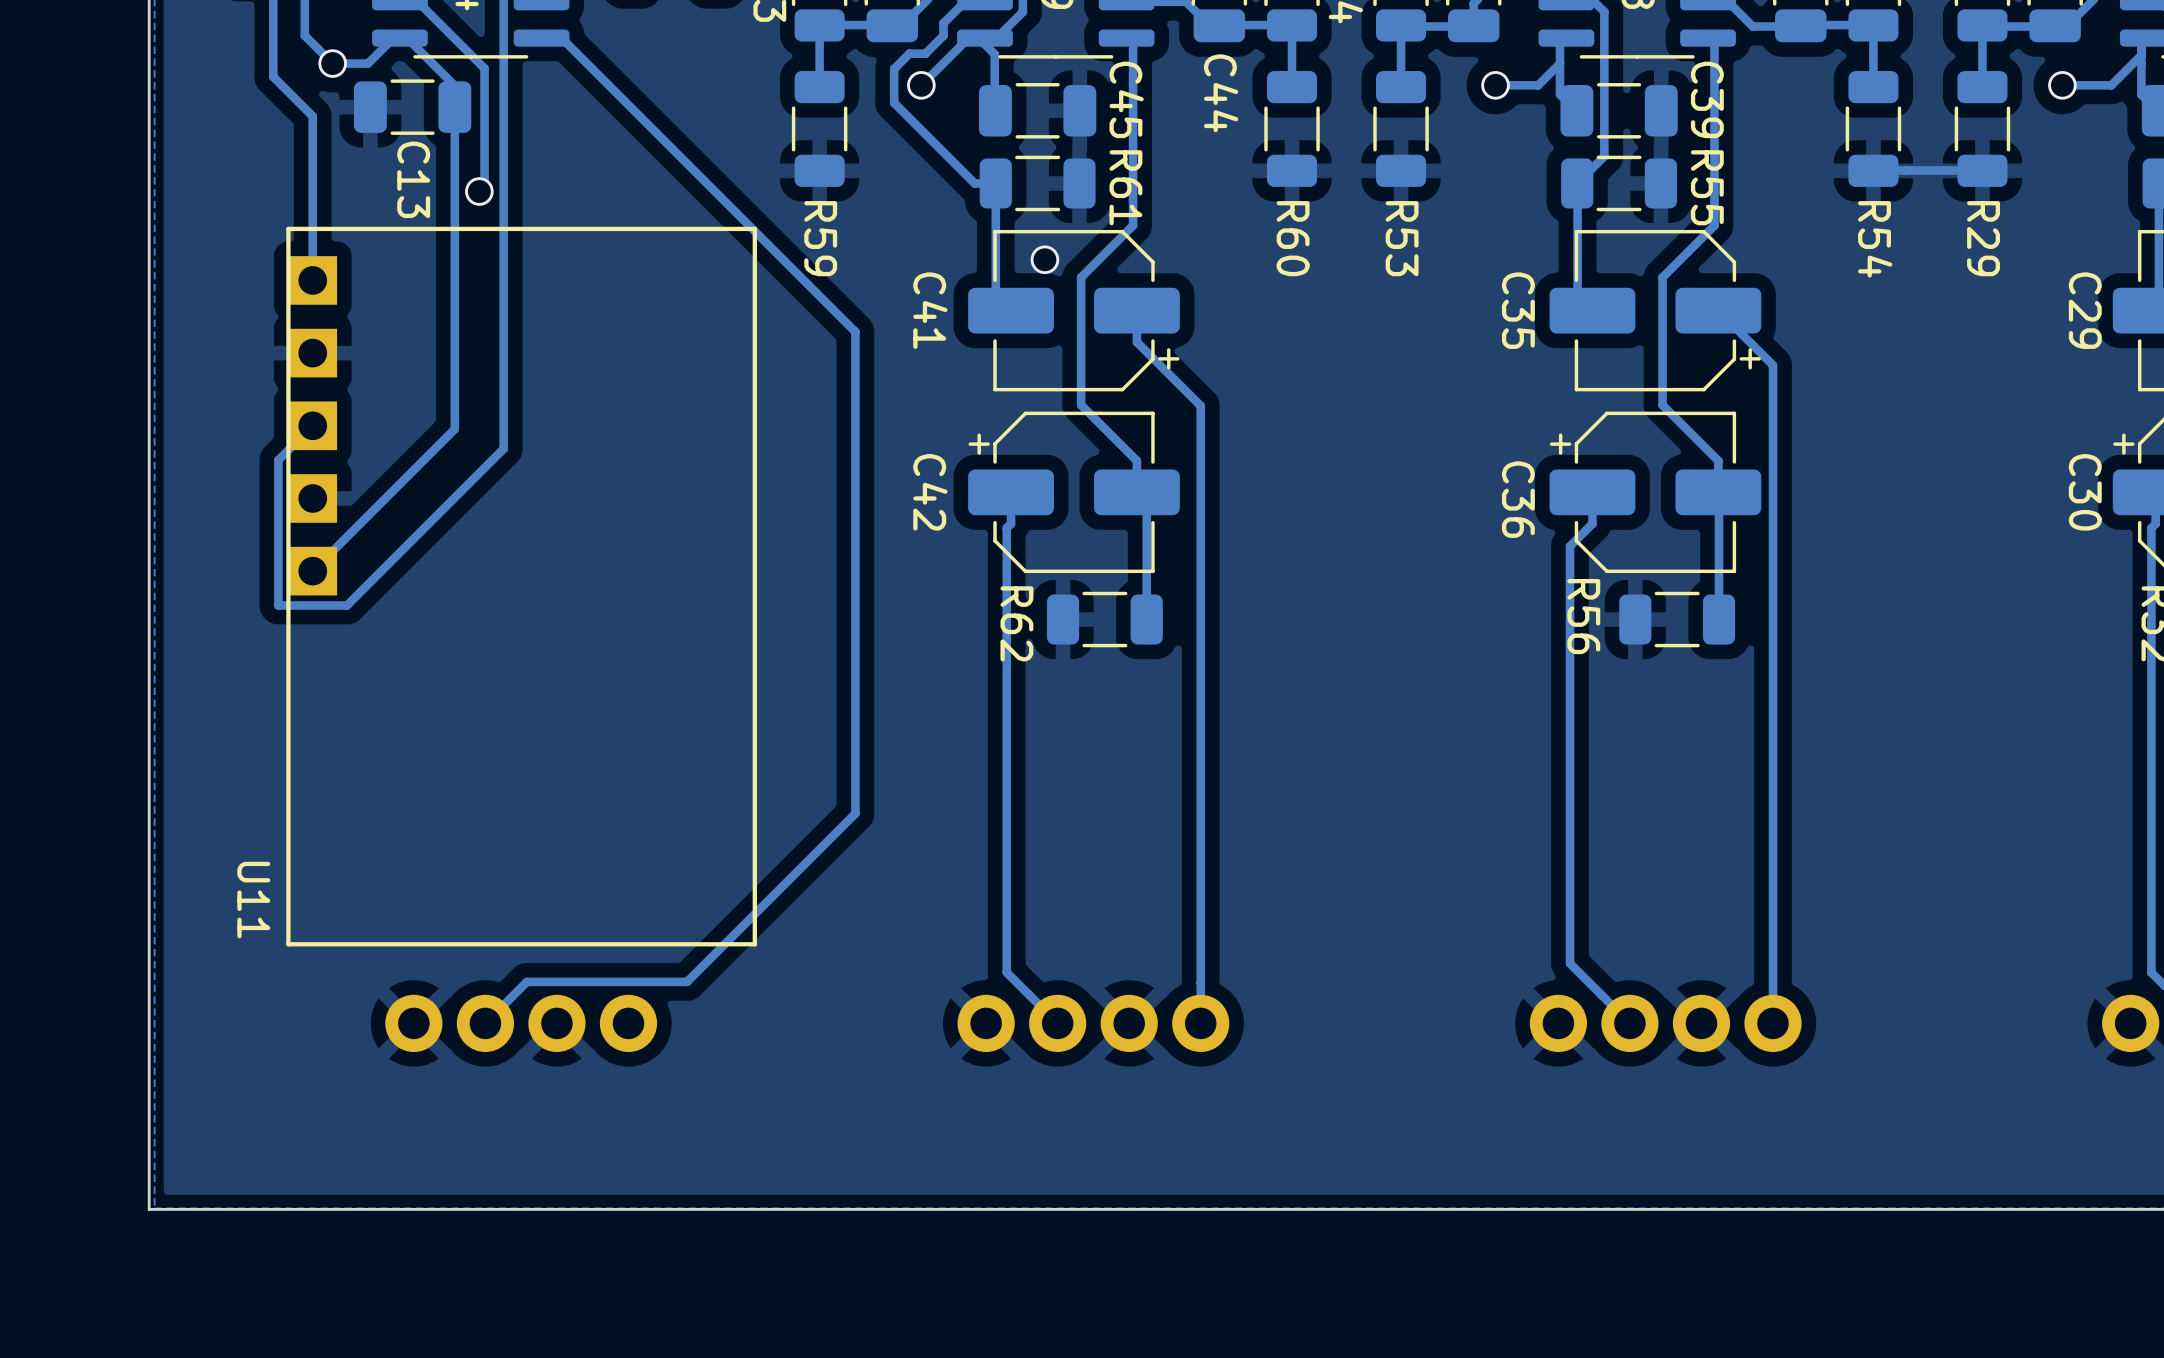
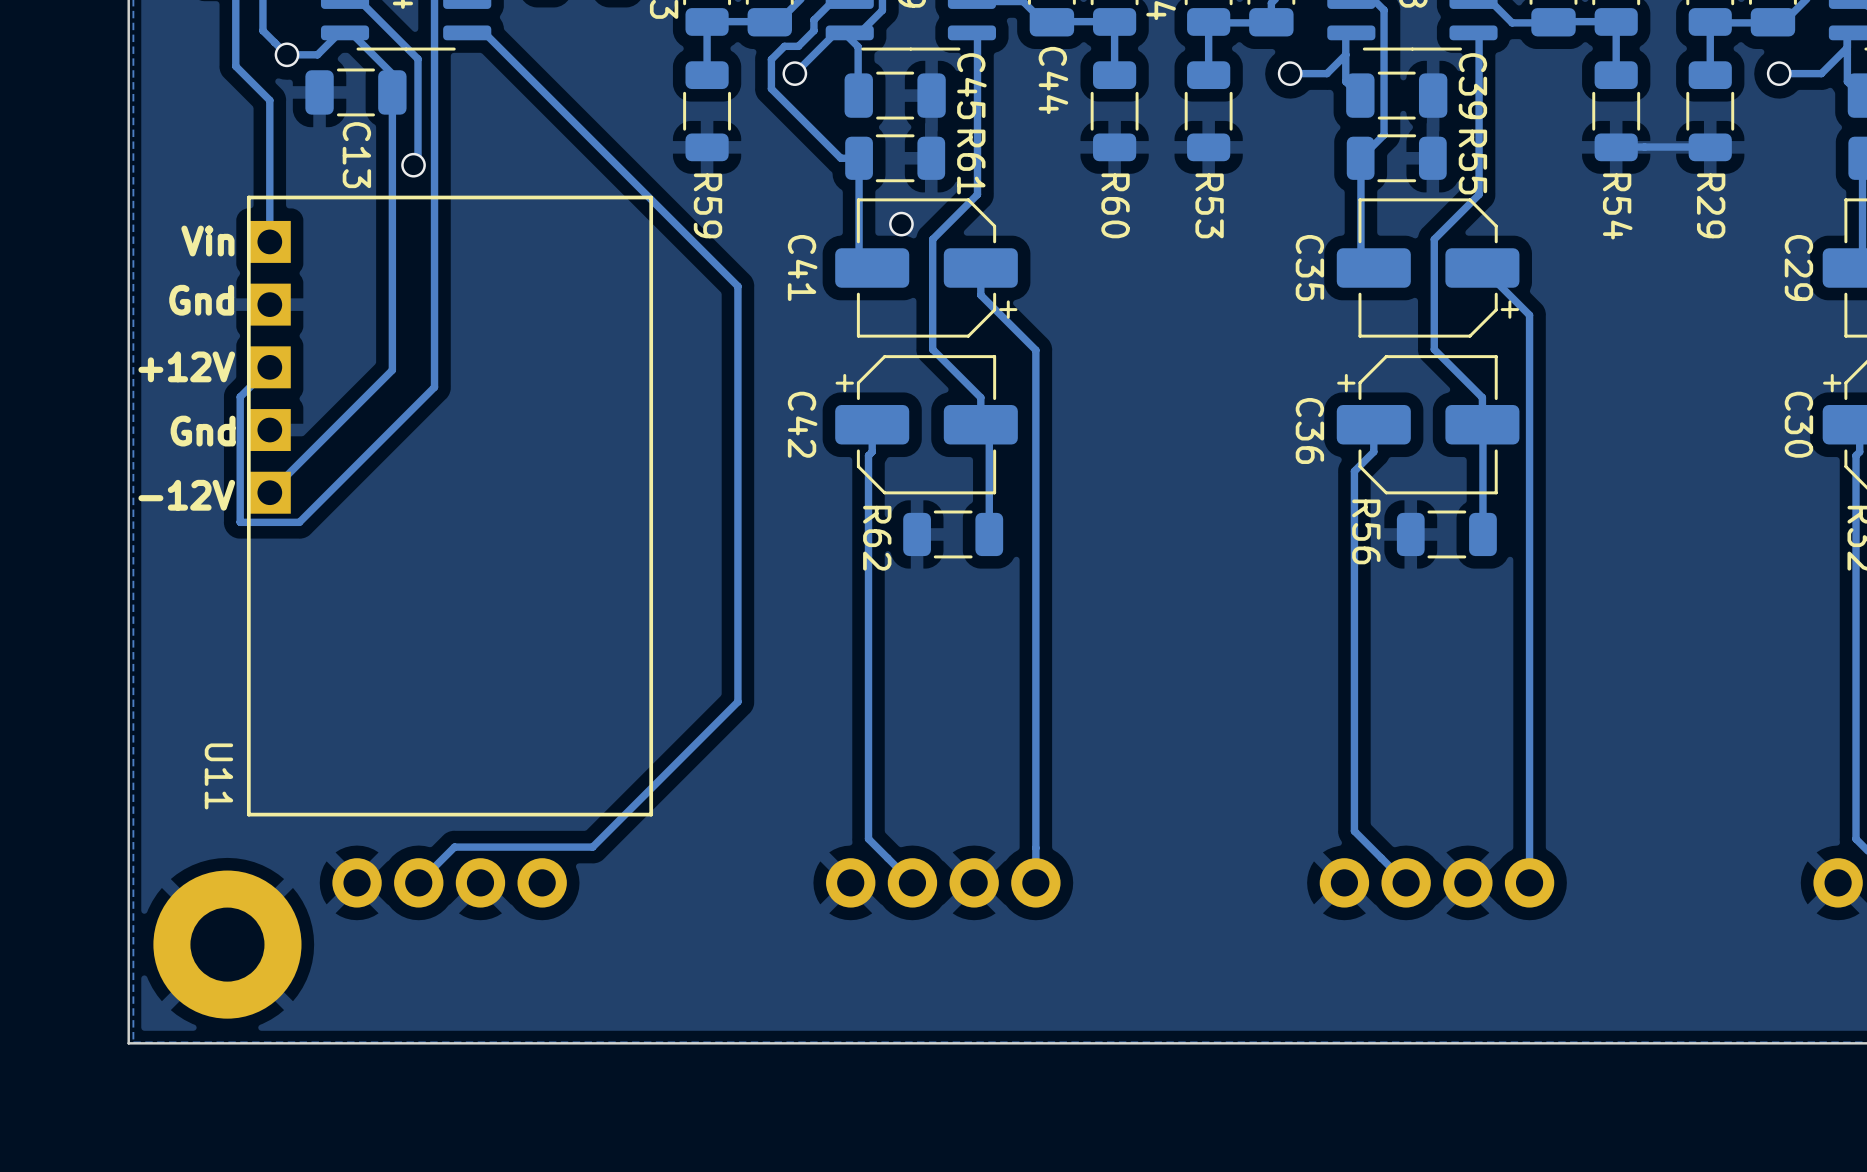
text: none -> Vin (207, 241)
text: none -> Gnd (201, 300)
text: none -> +12V (186, 366)
text: none -> Gnd (203, 431)
text: none -> -12V (186, 495)
part: none -> (227, 944)

